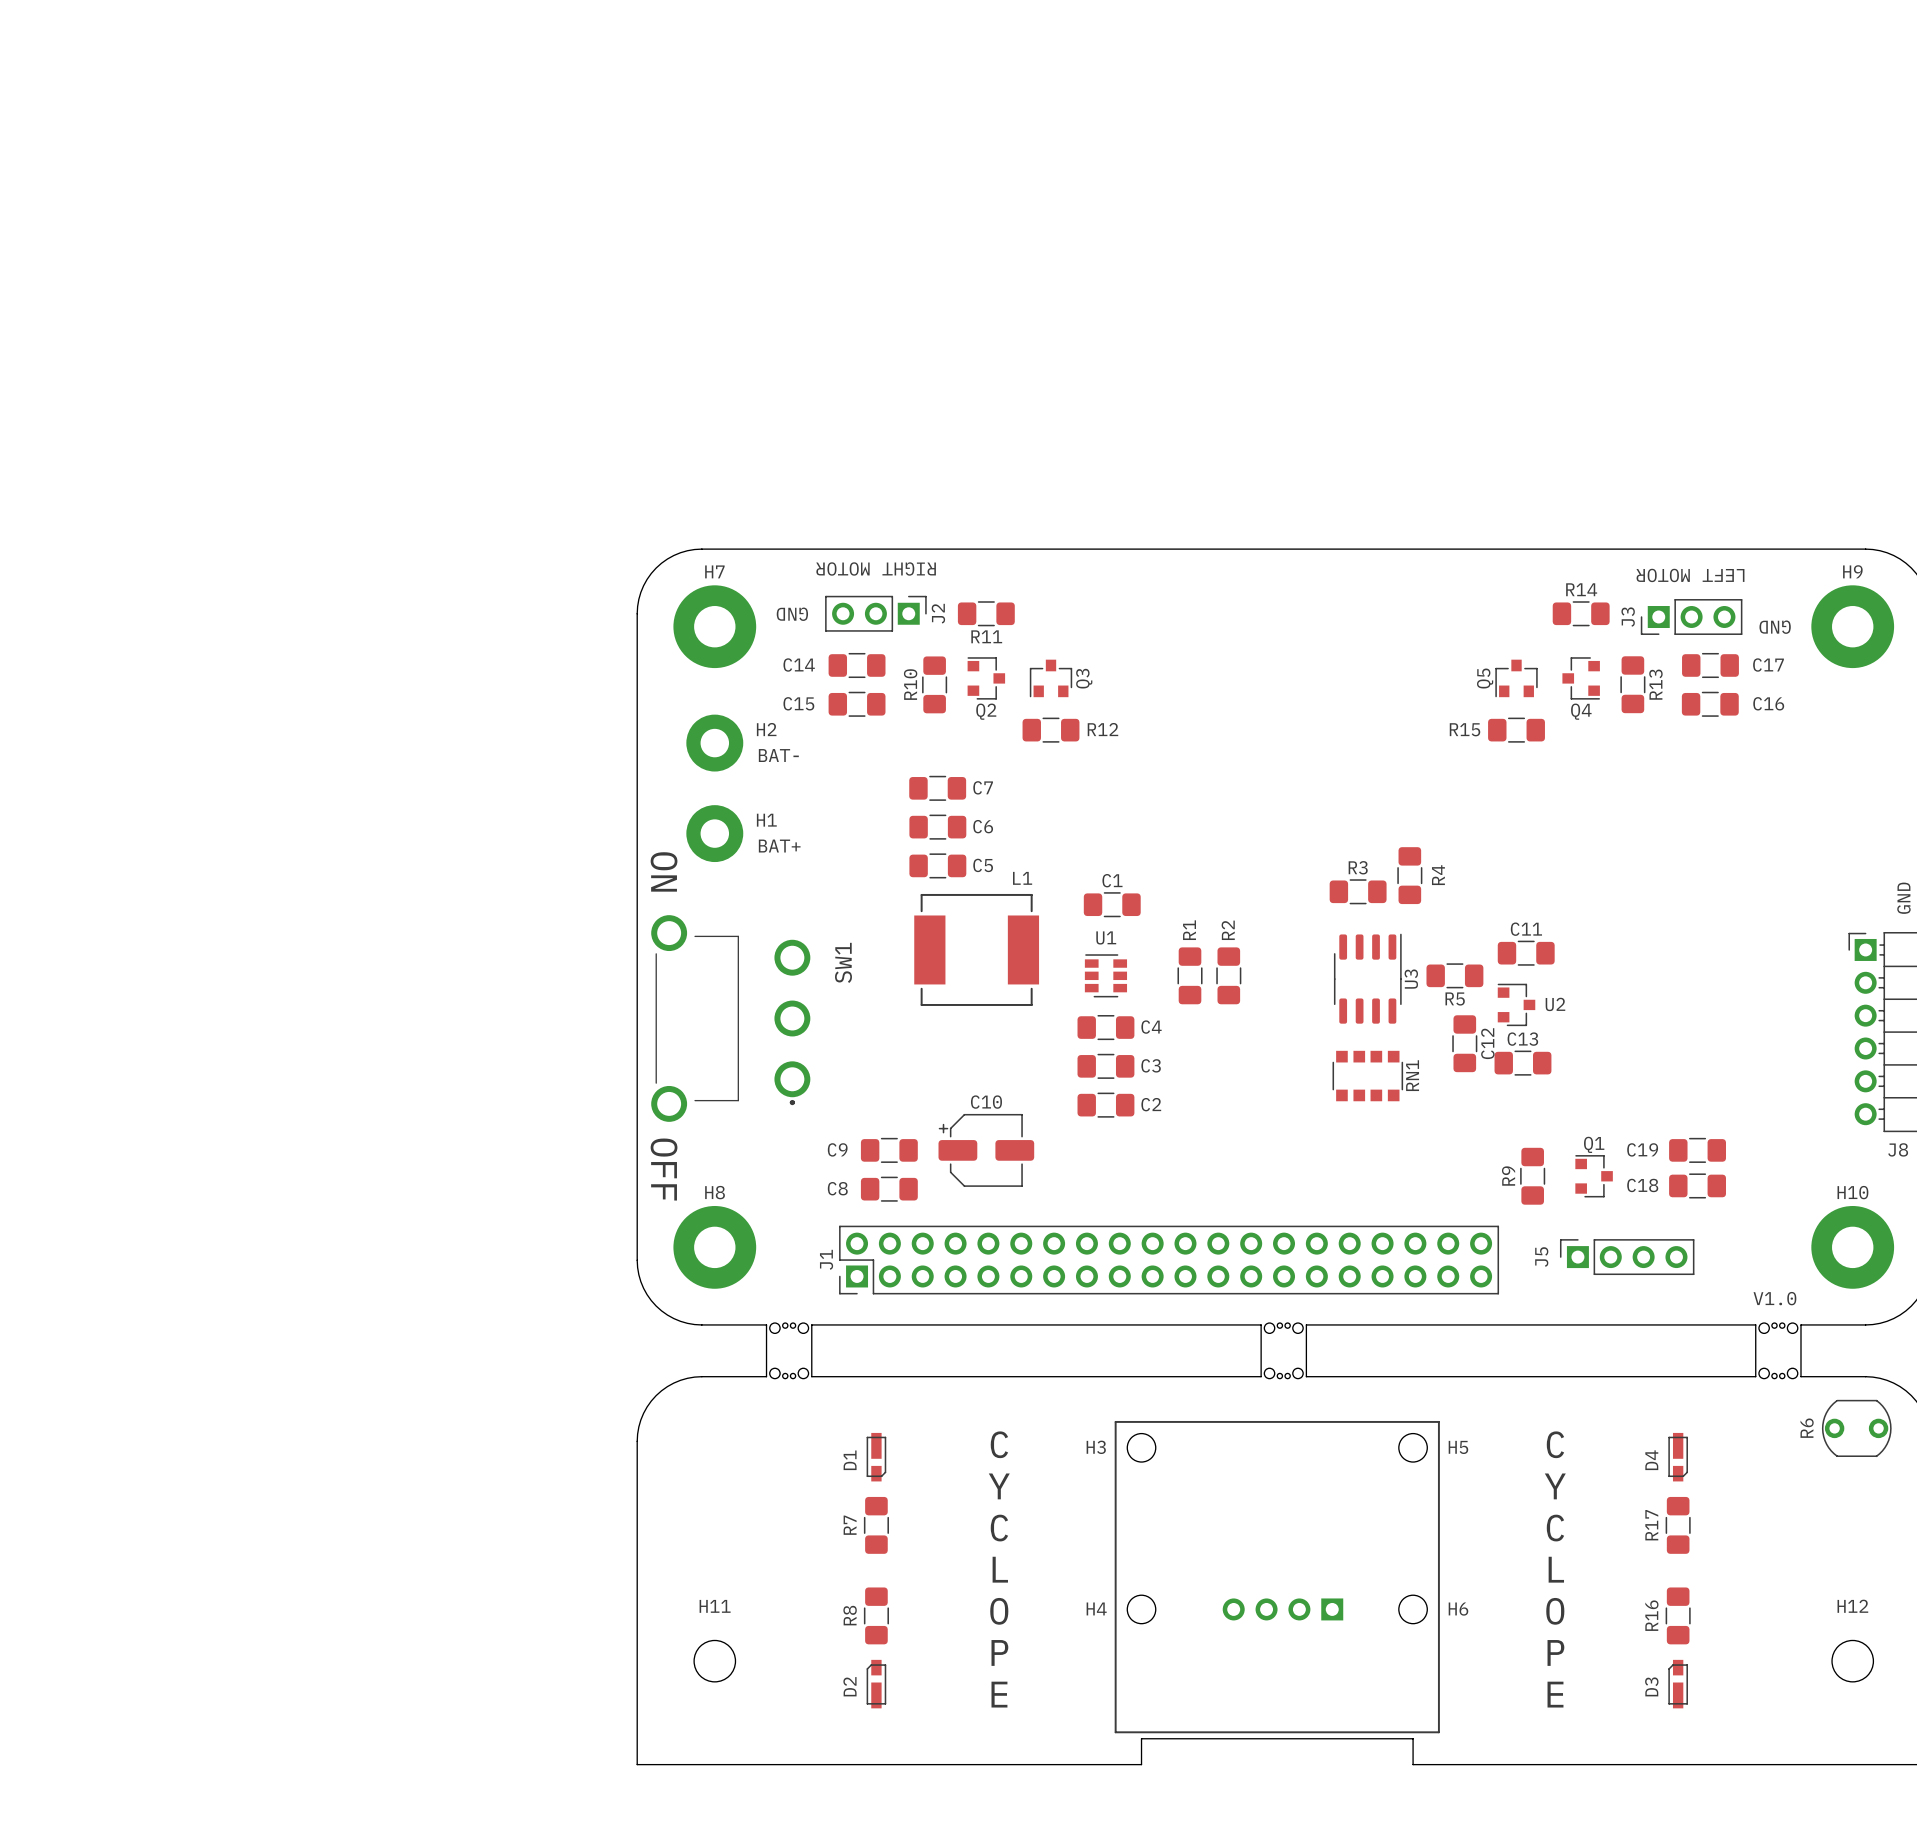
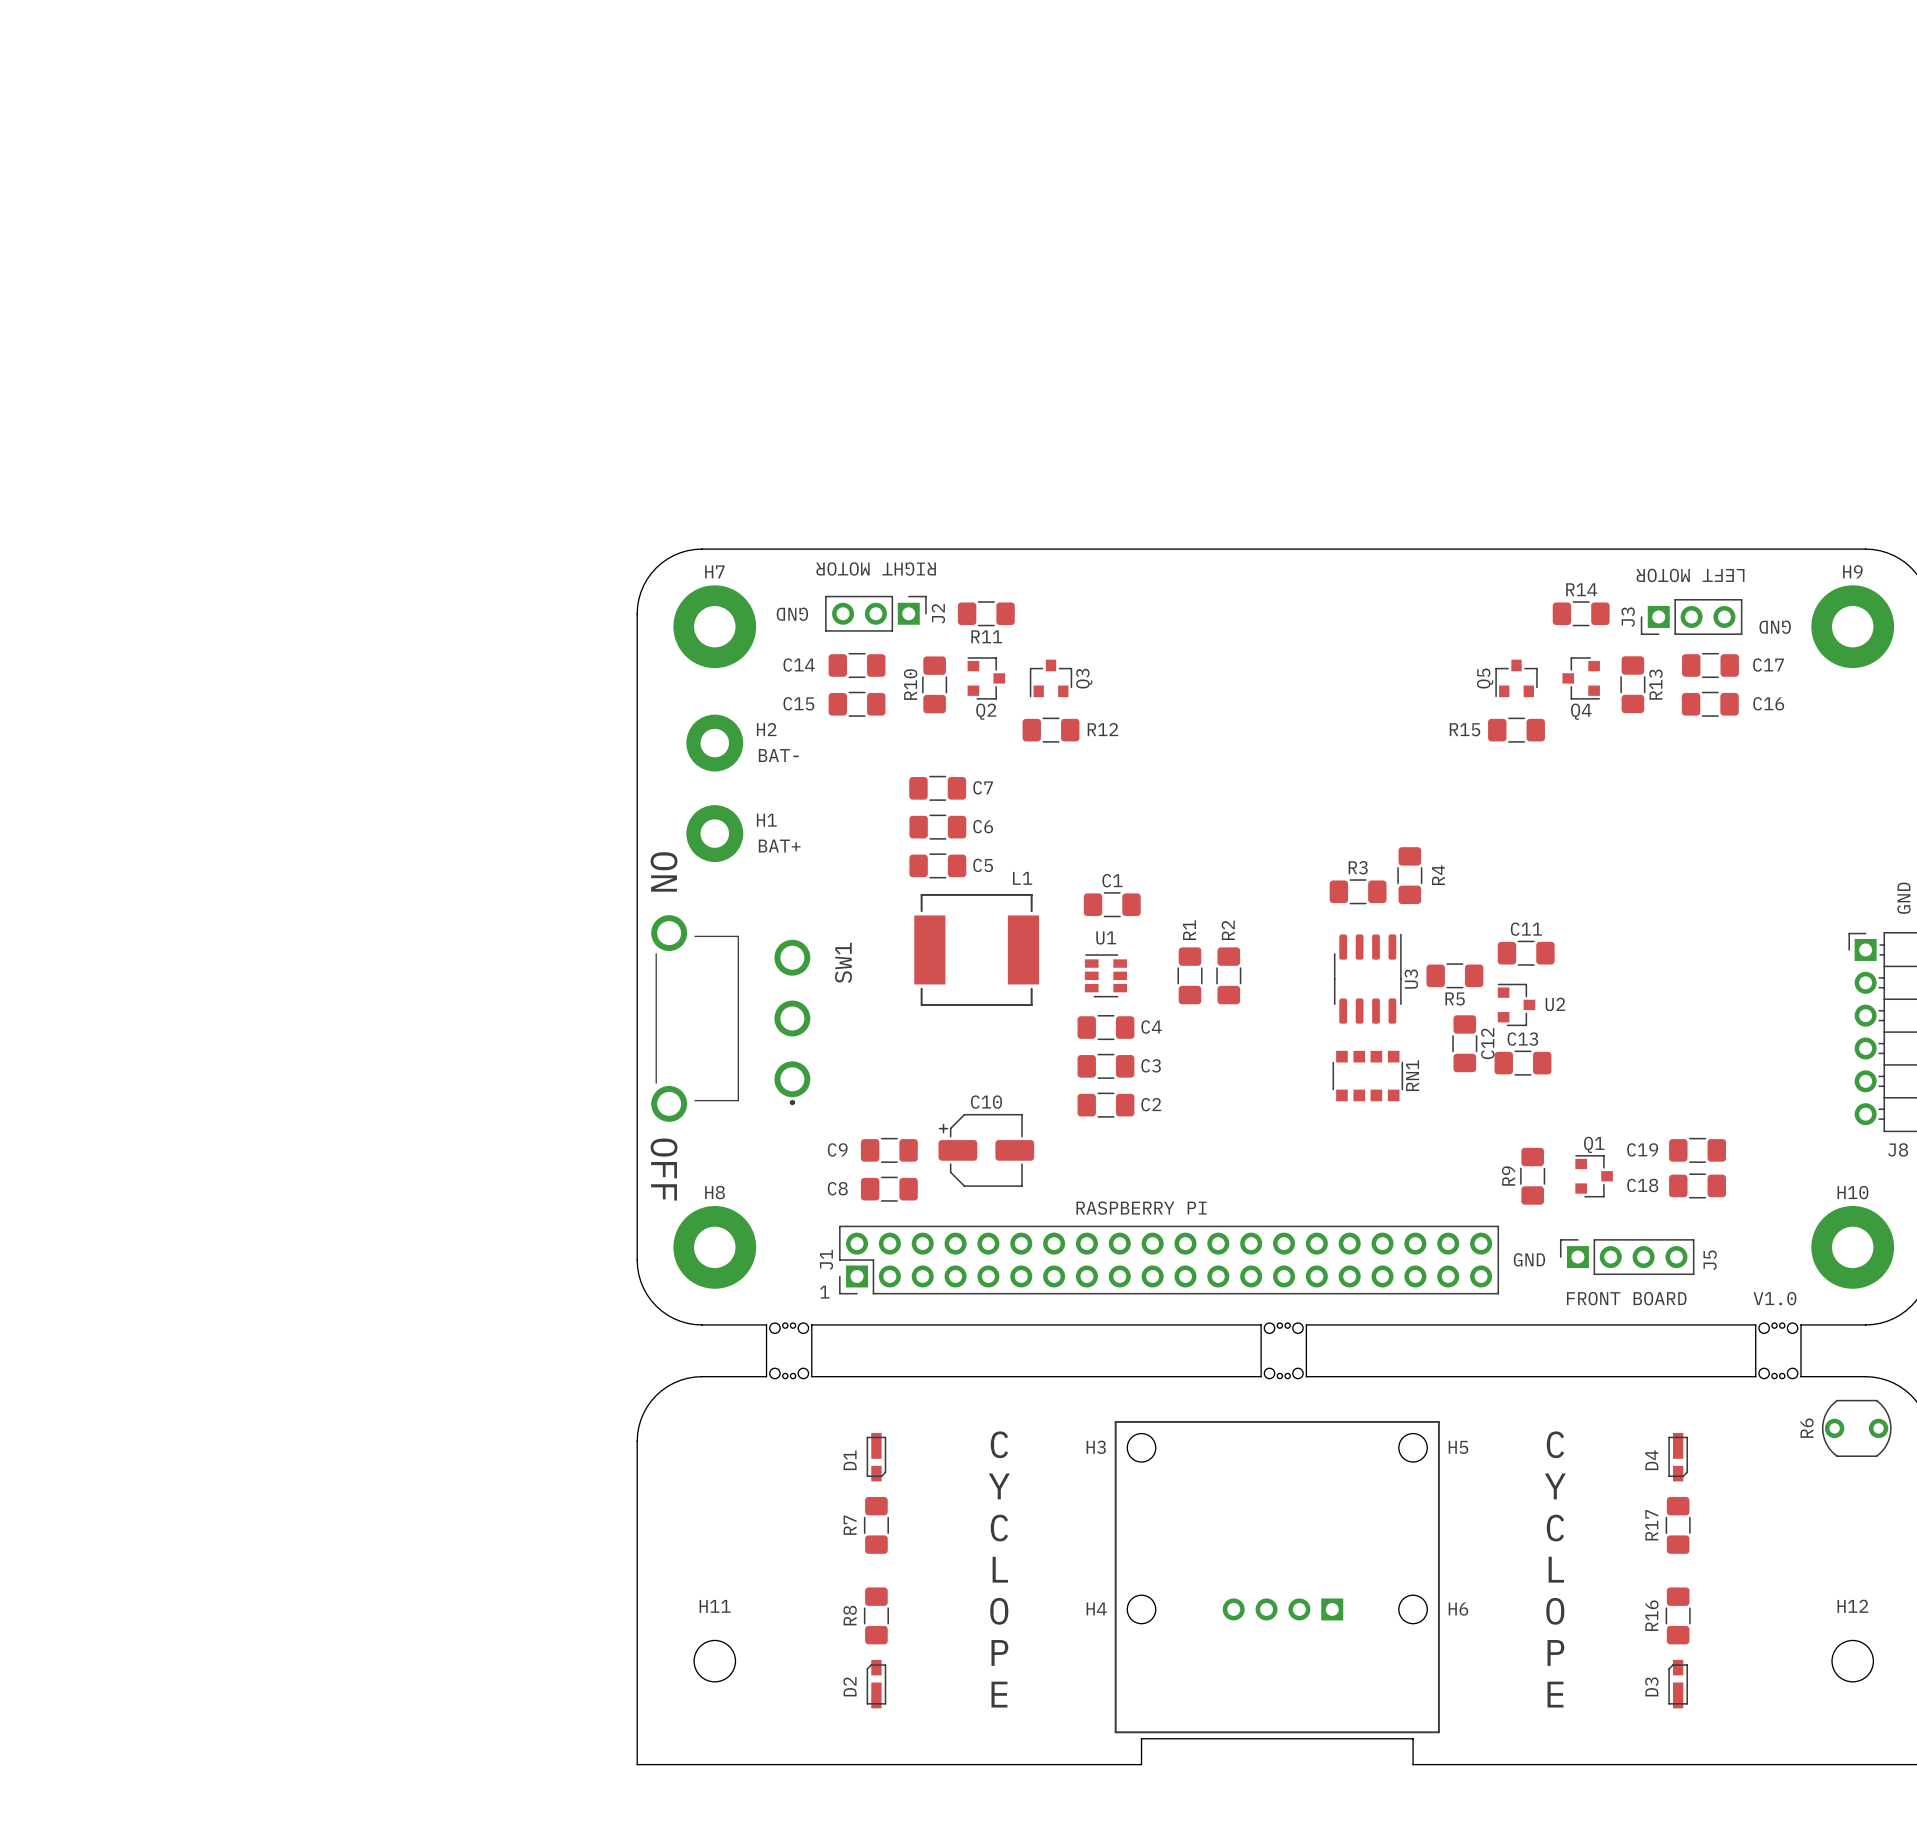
text: none -> RASPBERRY PI (1141, 1208)
J5 name position: J5 (1541, 1257) -> J5 (1710, 1260)
text: none -> GND (1529, 1259)
text: none -> 1 (824, 1292)
text: none -> FRONT BOARD (1626, 1298)

